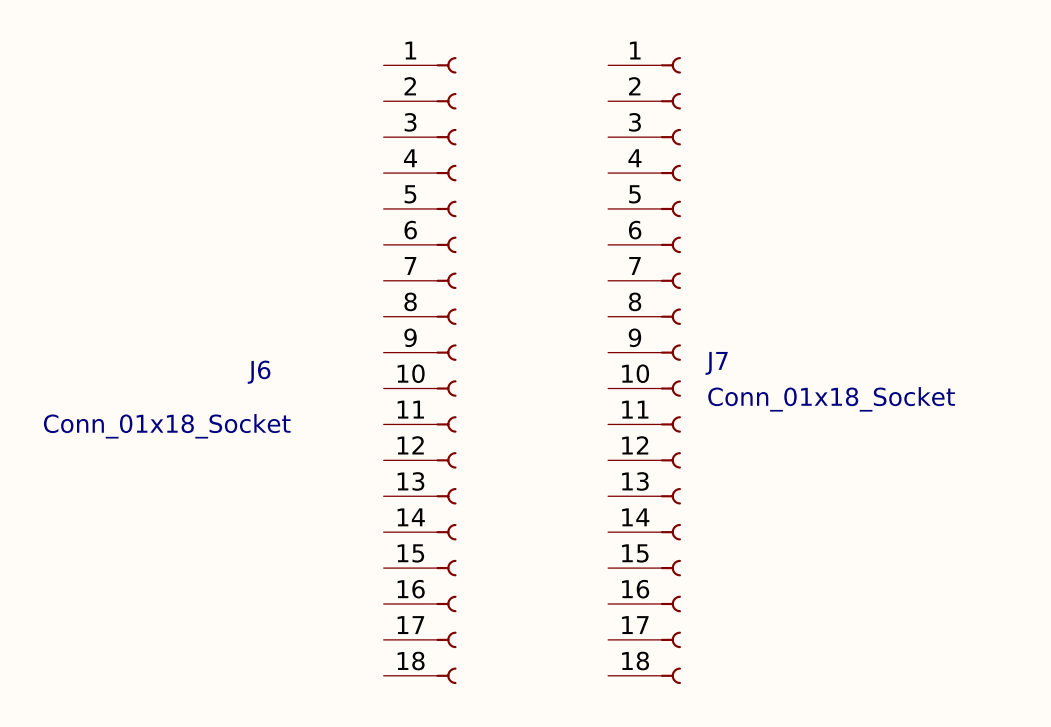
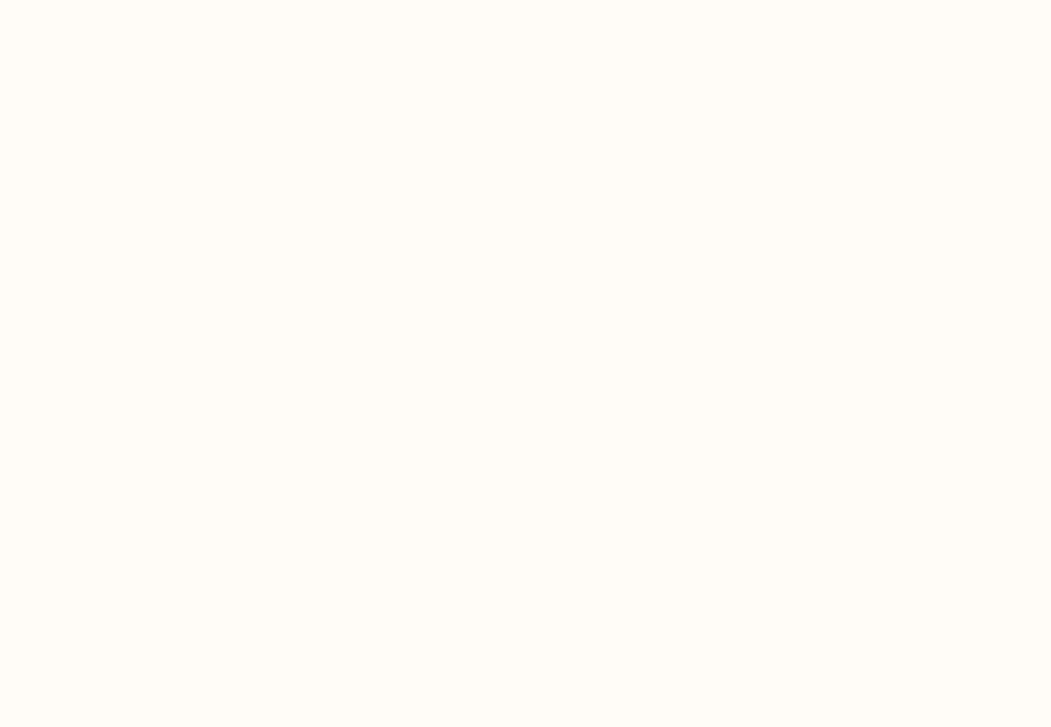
J6: Conn_01x18_Socket (420, 370) -> none
J7: Conn_01x18_Socket (644, 370) -> none

